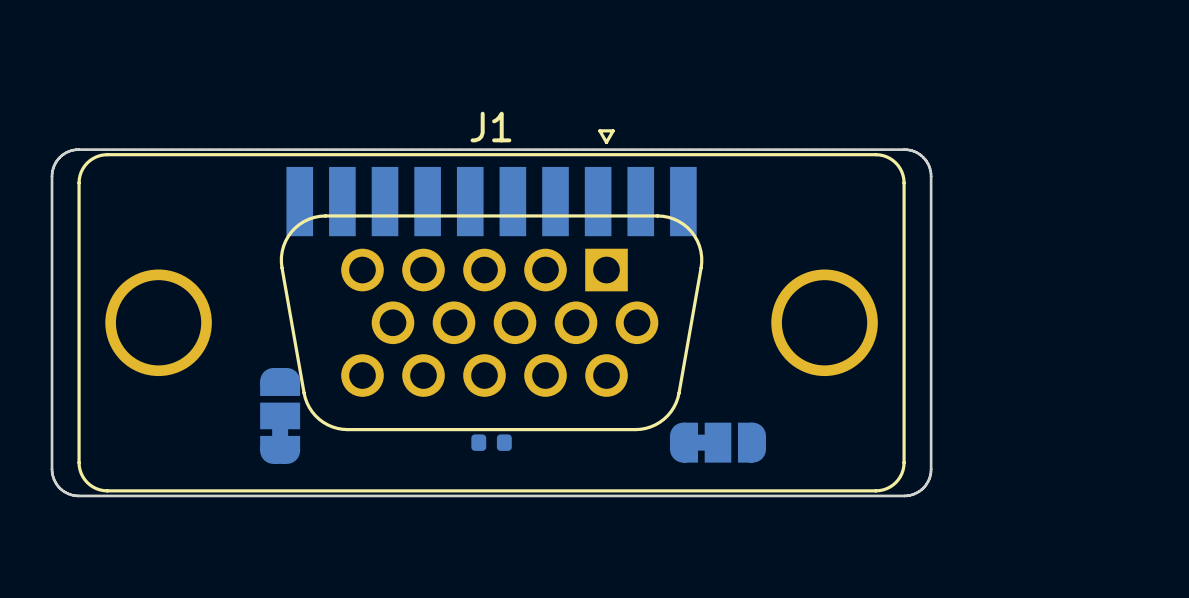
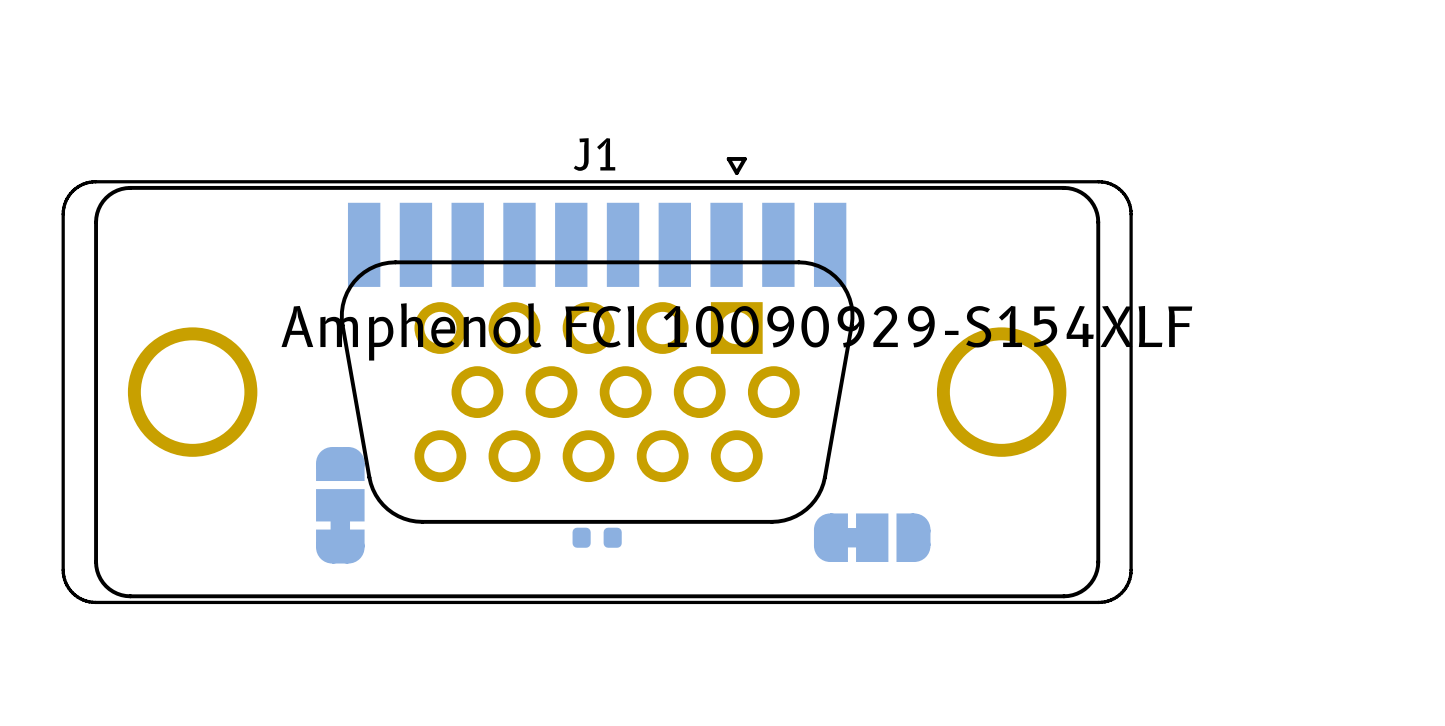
J1 text: none -> Amphenol FCI 10090929-S154XLF (736, 331)

